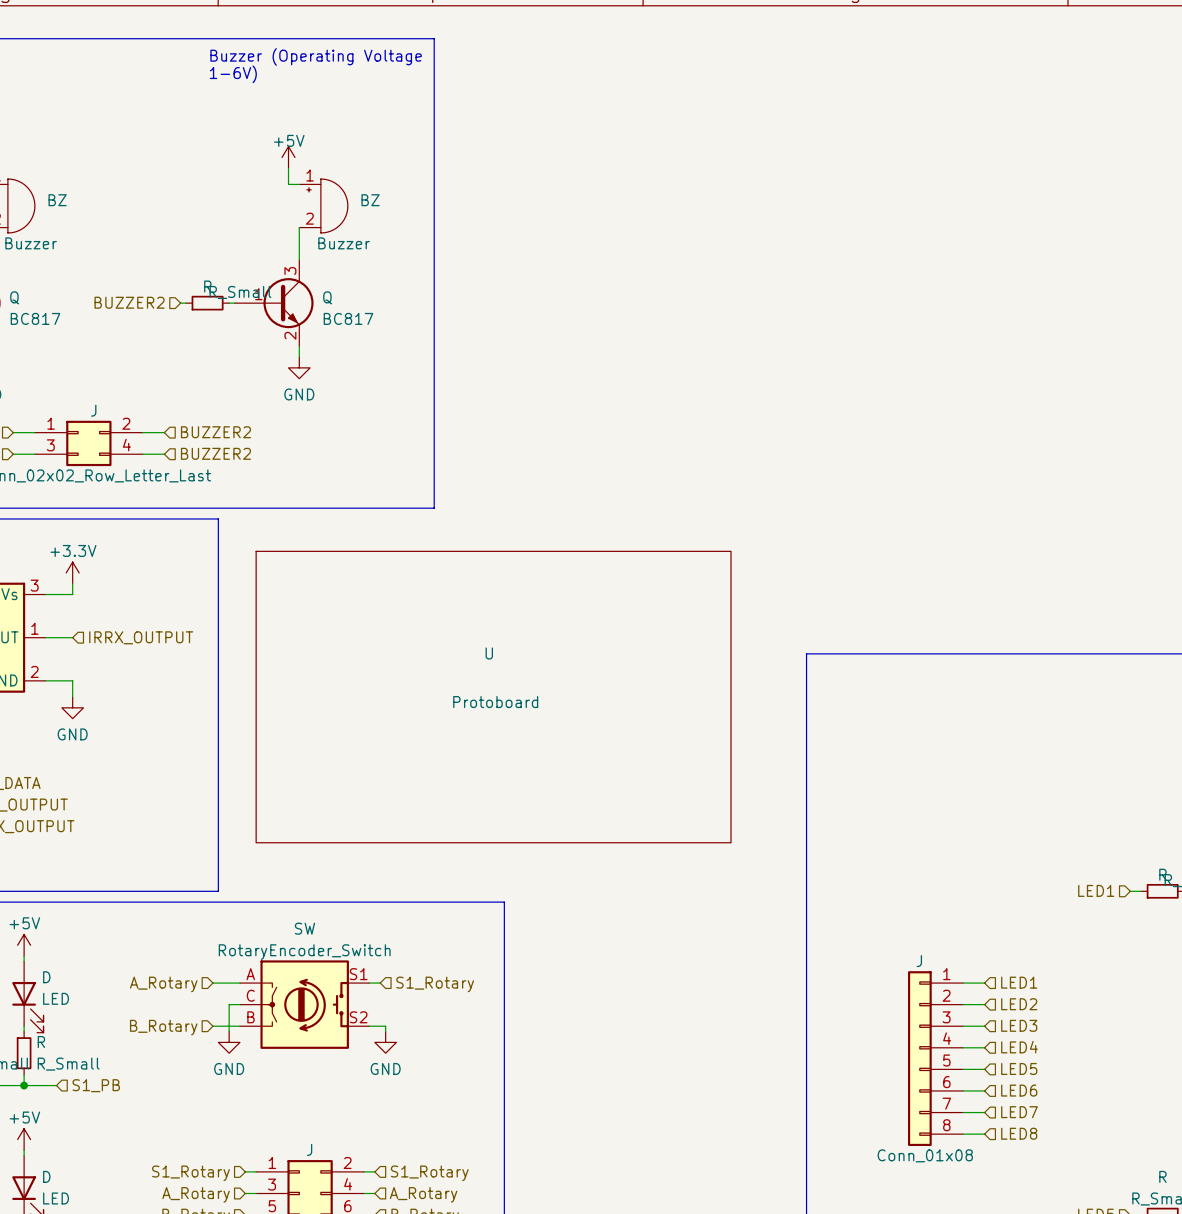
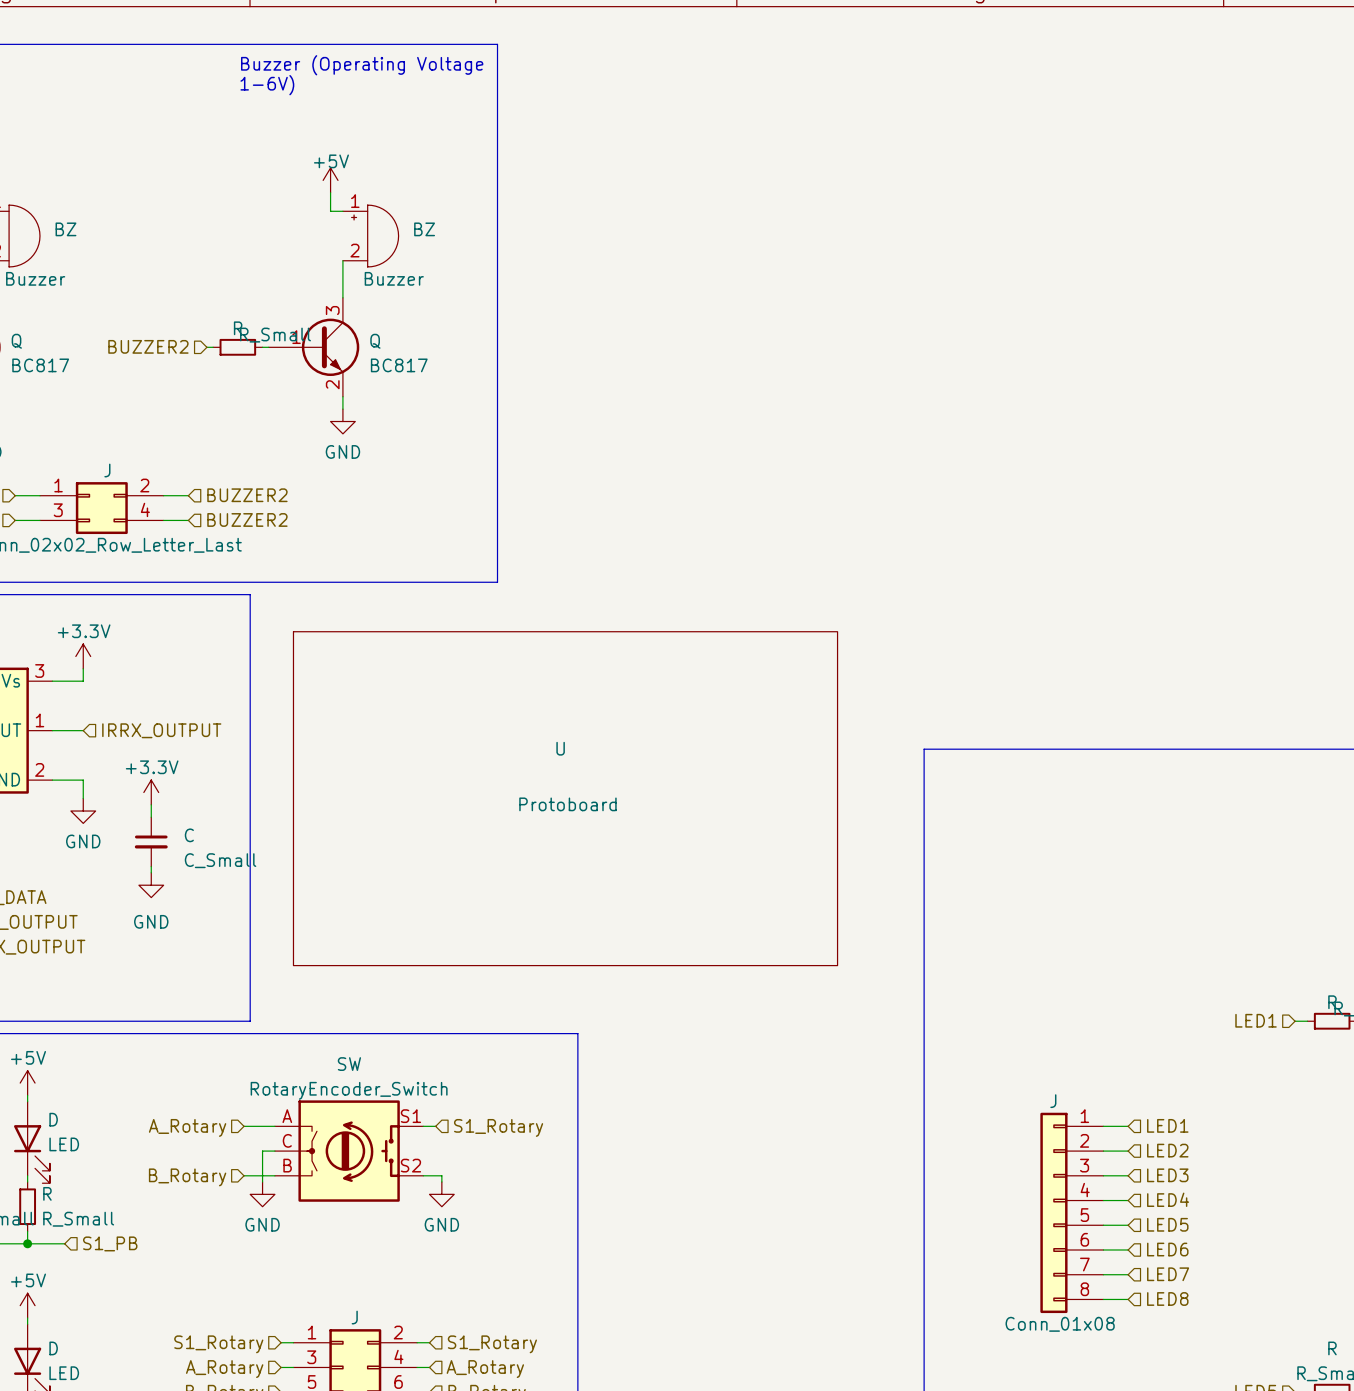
power symbol: none -> +3.3V (151, 792)
wire: none -> (151, 804) (151, 817)
C: none -> C_Small (151, 841)
wire: none -> (151, 866) (151, 872)
power symbol: none -> GND (151, 885)

